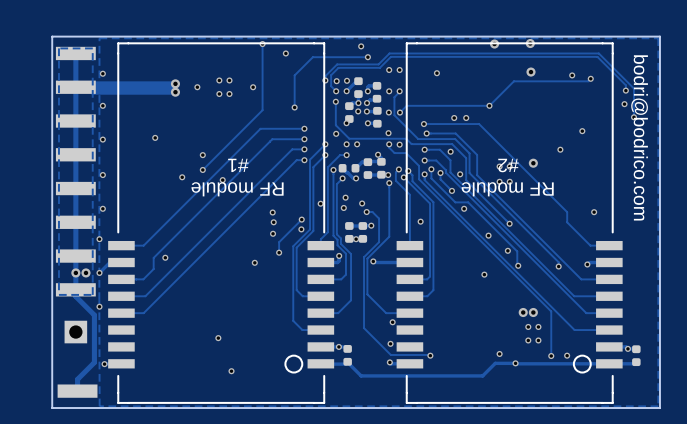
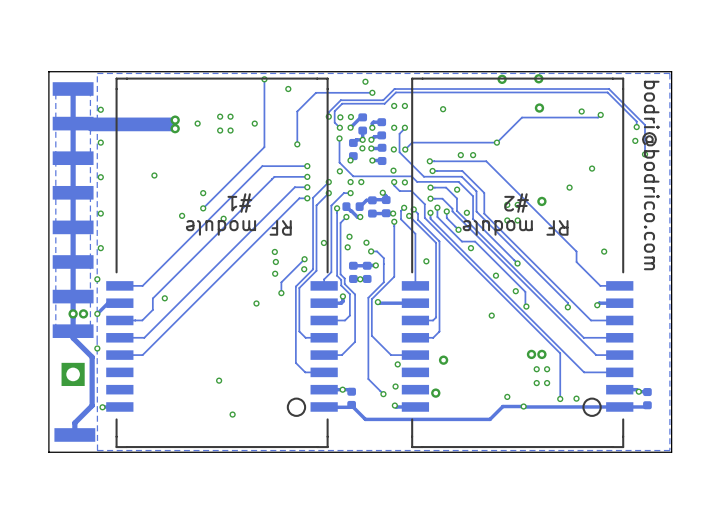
via: none -> (443, 360)
track: (364, 328) (390, 354) (430, 355) -> (368, 370) (368, 379) (383, 394)
via: none -> (435, 393)
via position: (430, 355) -> (383, 394)

